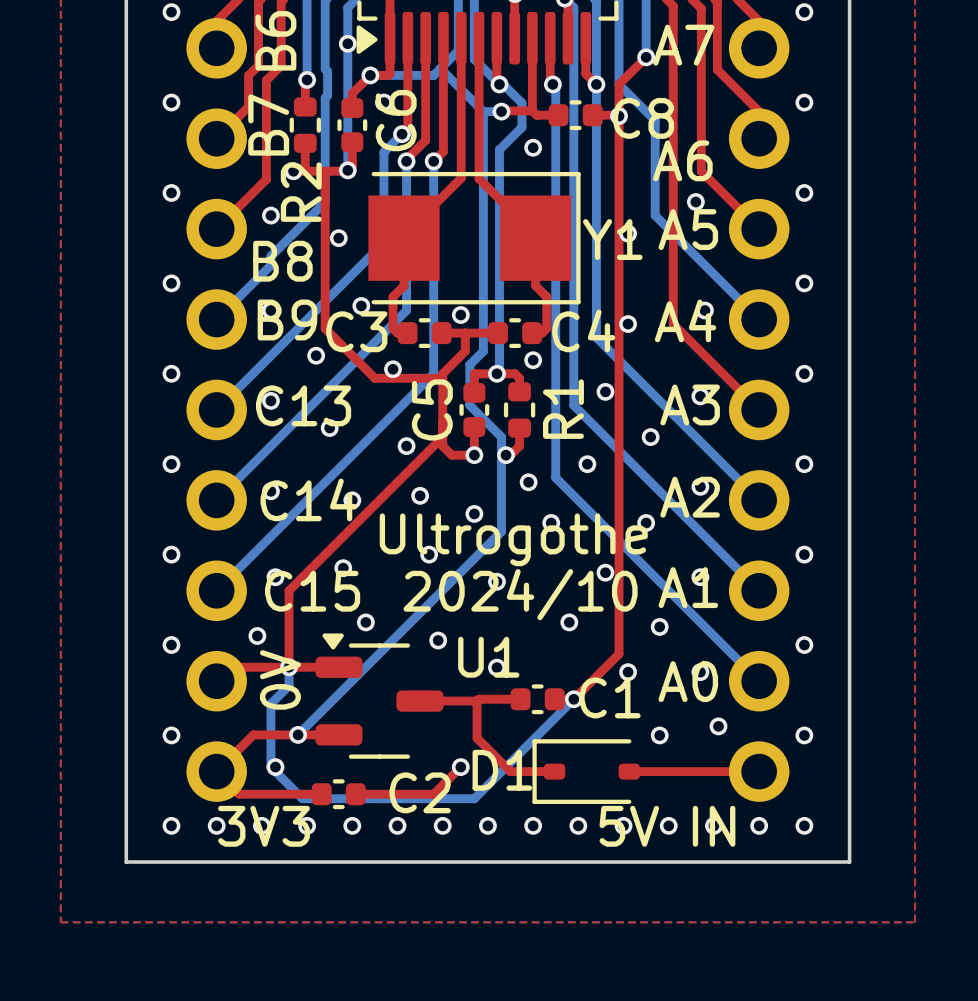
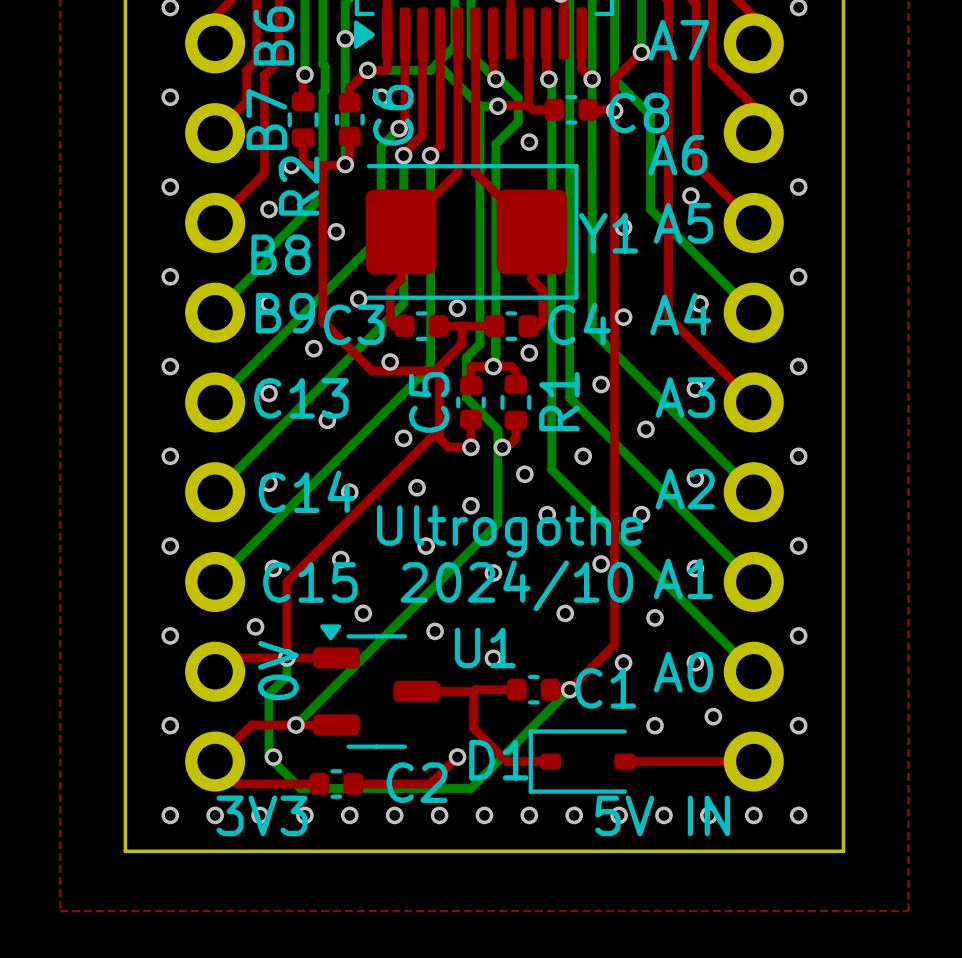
Y1 footprint: [368, 171, 581, 305] -> [365, 164, 579, 300]

